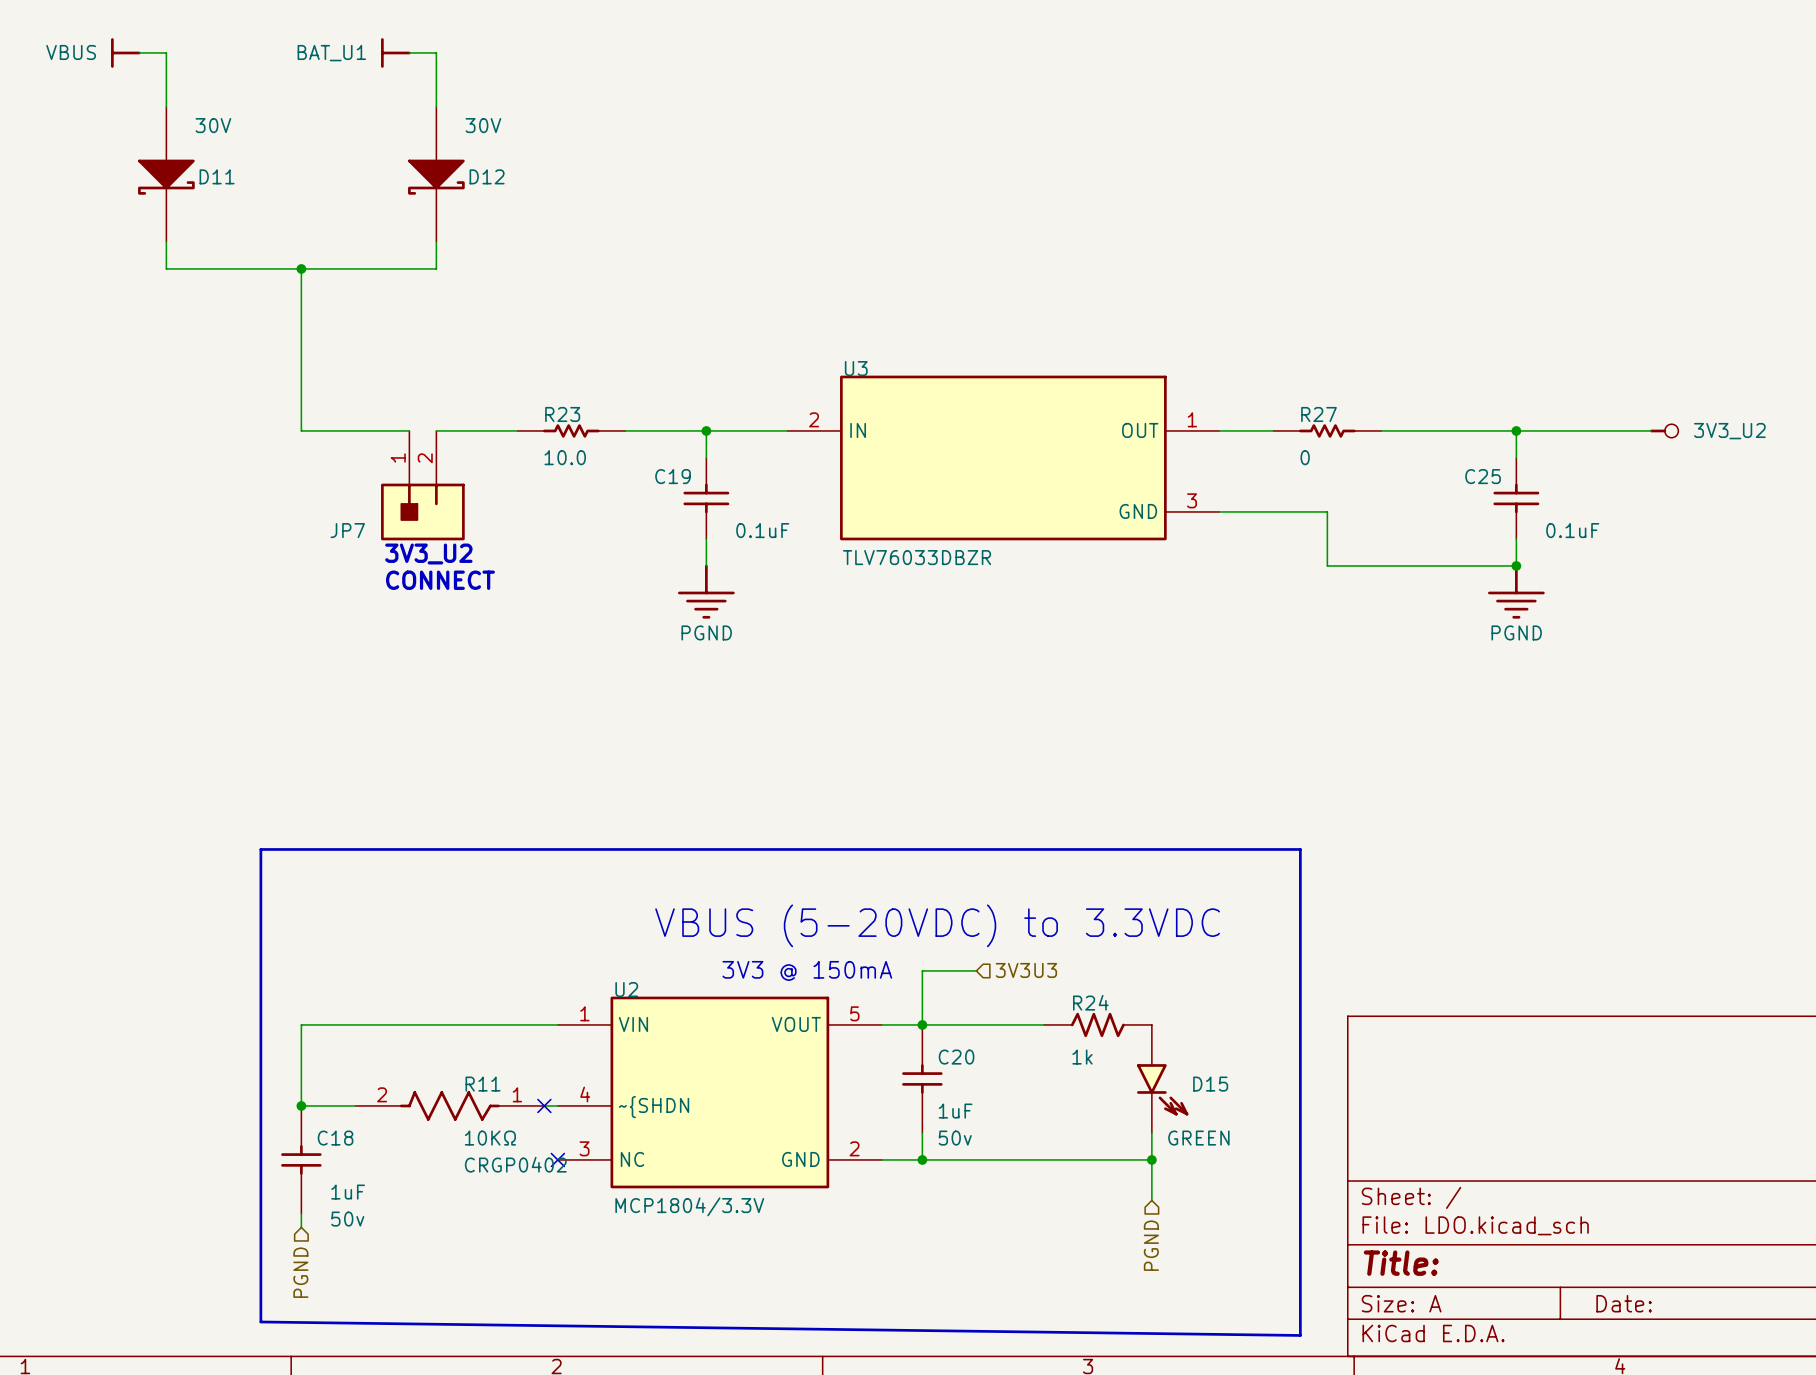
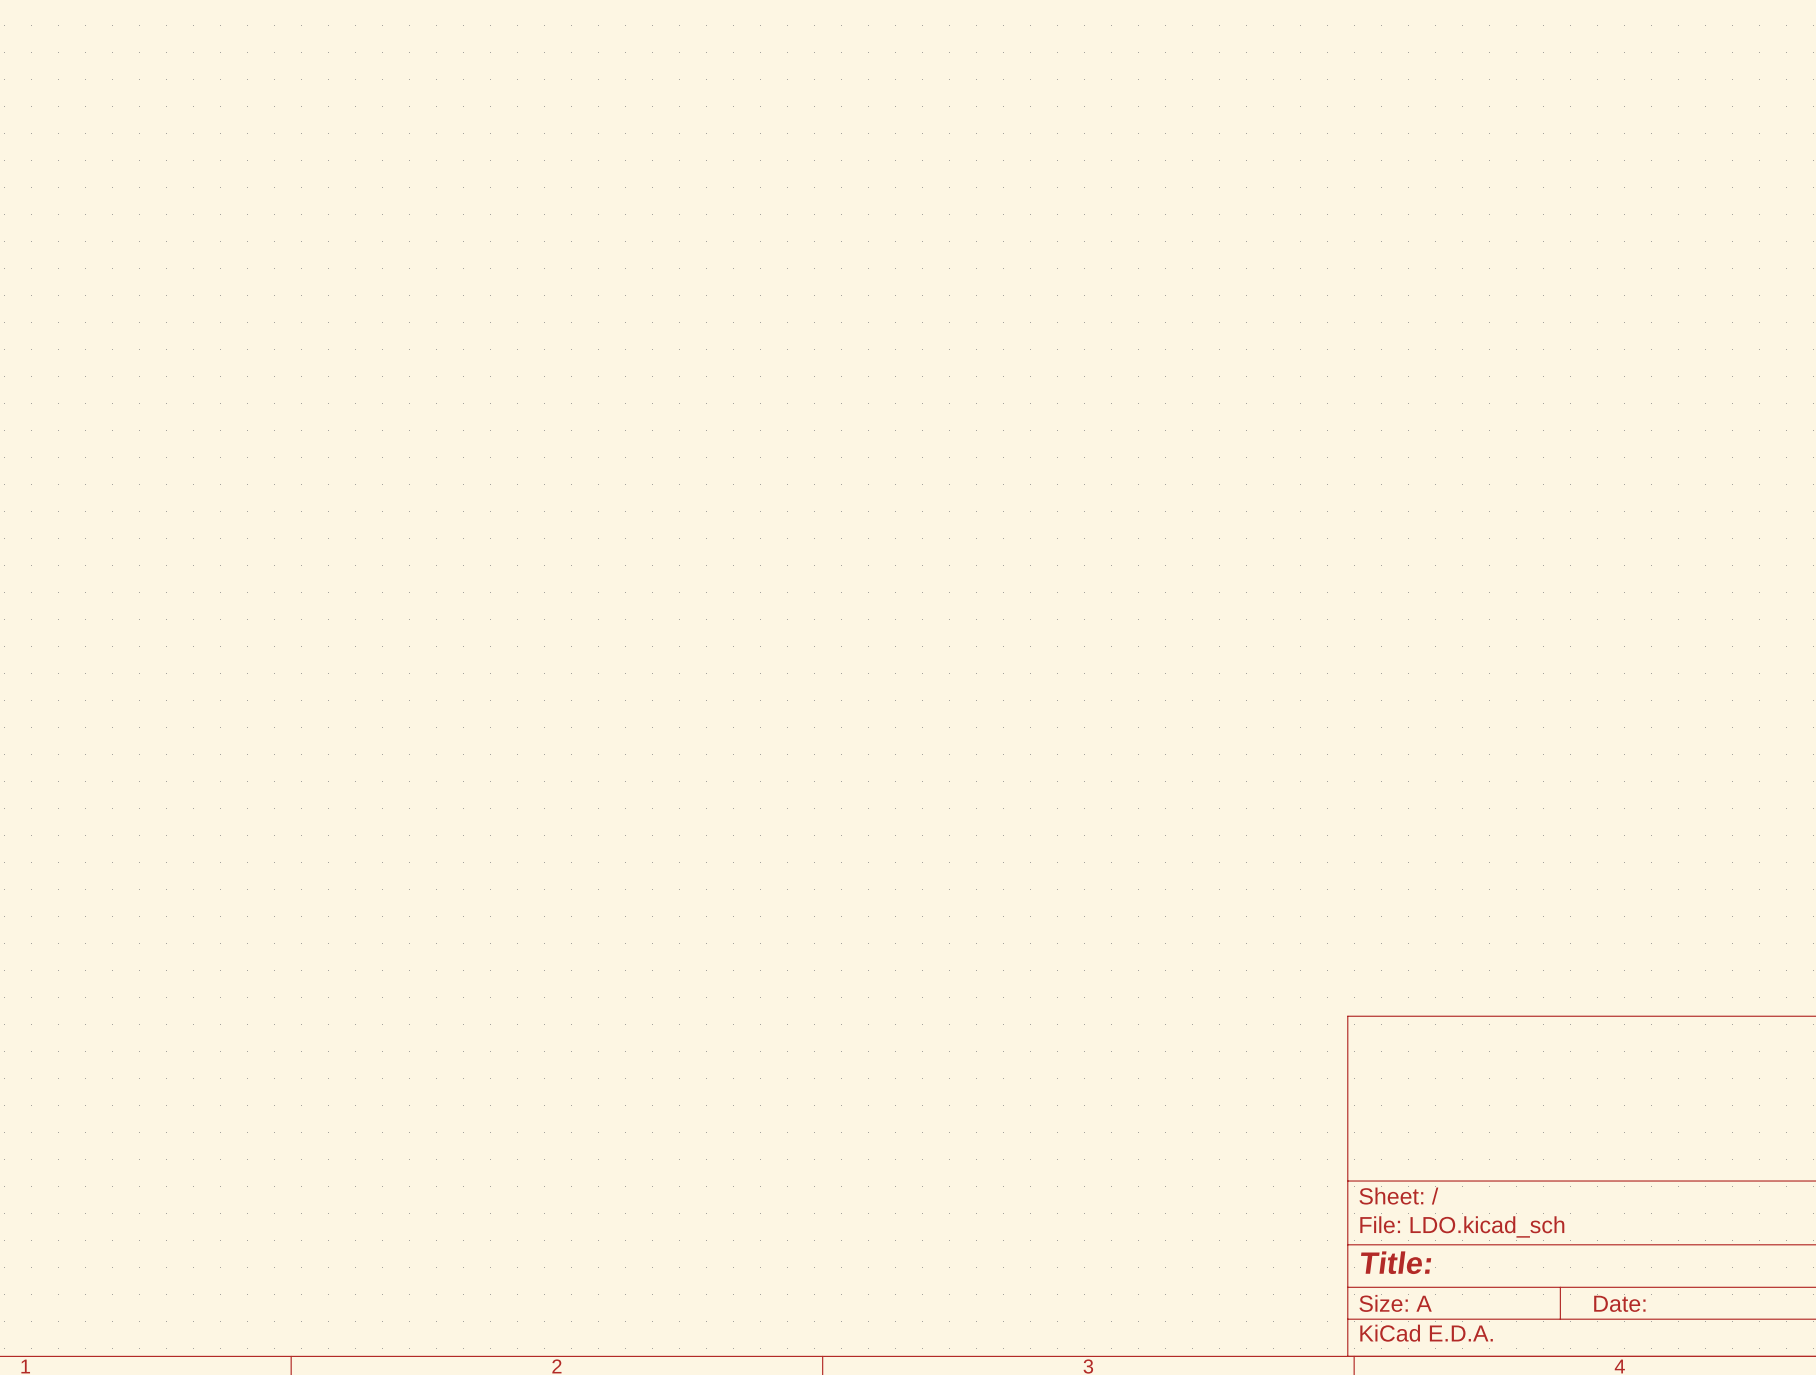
power symbol: VBUS (125, 52) -> none
wire: (139, 52) (166, 52) (166, 106) -> none
power symbol: BAT_U1 (395, 52) -> none
wire: (409, 52) (436, 52) (436, 106) -> none
D11: (166, 174) -> none
D12: (436, 174) -> none
wire: (166, 241) (166, 268) (436, 268) (436, 241) -> none
wire: (301, 268) (301, 430) (409, 430) -> none
junction: (301, 268) -> none
wire: (436, 430) (517, 430) -> none
R23: (571, 430) -> none
wire: (625, 430) (787, 430) -> none
wire: (706, 430) (706, 457) -> none
junction: (706, 430) -> none
wire: (1219, 430) (1273, 430) -> none
R27: (1327, 430) -> none
wire: (1381, 430) (1651, 430) -> none
wire: (1516, 430) (1516, 457) -> none
junction: (1516, 430) -> none
power symbol: 3V3_U2 (1664, 430) -> none
U3: (1003, 457) -> none
JP7: (422, 485) -> none
C19: (706, 498) -> none
C25: (1516, 498) -> none
wire: (1219, 511) (1327, 511) (1327, 565) (1516, 565) (1516, 538) -> none
wire: (706, 538) (706, 565) -> none
text: 3V3_U2 (428, 554) -> none
junction: (1516, 565) -> none
text: CONNECT (440, 580) -> none
power symbol: PGND (706, 591) -> none
power symbol: PGND (1516, 591) -> none
line: (260, 849) (1300, 849) (1300, 1335) (260, 1321) (260, 849) -> none
text: VBUS (5-20VDC) to 3.3VDC (937, 925) -> none
wire: (976, 970) (922, 970) (922, 1024) -> none
hierarchical label: 3V3U3 (1026, 970) -> none
text: 3V3 @ 150mA (807, 971) -> none
wire: (557, 1024) (301, 1024) (301, 1105) (355, 1105) -> none
wire: (881, 1024) (1043, 1024) -> none
junction: (922, 1024) -> none
R24: (1097, 1024) -> none
C20: (922, 1078) -> none
D15: (1162, 1078) -> none
U2: (719, 1092) -> none
junction: (301, 1105) -> none
R11: (449, 1105) -> none
wire: (544, 1105) (557, 1105) -> none
no-connect mark: (544, 1105) -> none
wire: (922, 1132) (922, 1159) -> none
wire: (1151, 1132) (1151, 1200) -> none
C18: (301, 1159) -> none
no-connect mark: (557, 1159) -> none
wire: (881, 1159) (1151, 1159) -> none
junction: (922, 1159) -> none
junction: (1151, 1159) -> none
wire: (301, 1213) (301, 1227) -> none
hierarchical label: PGND (1151, 1245) -> none
hierarchical label: PGND (300, 1272) -> none

